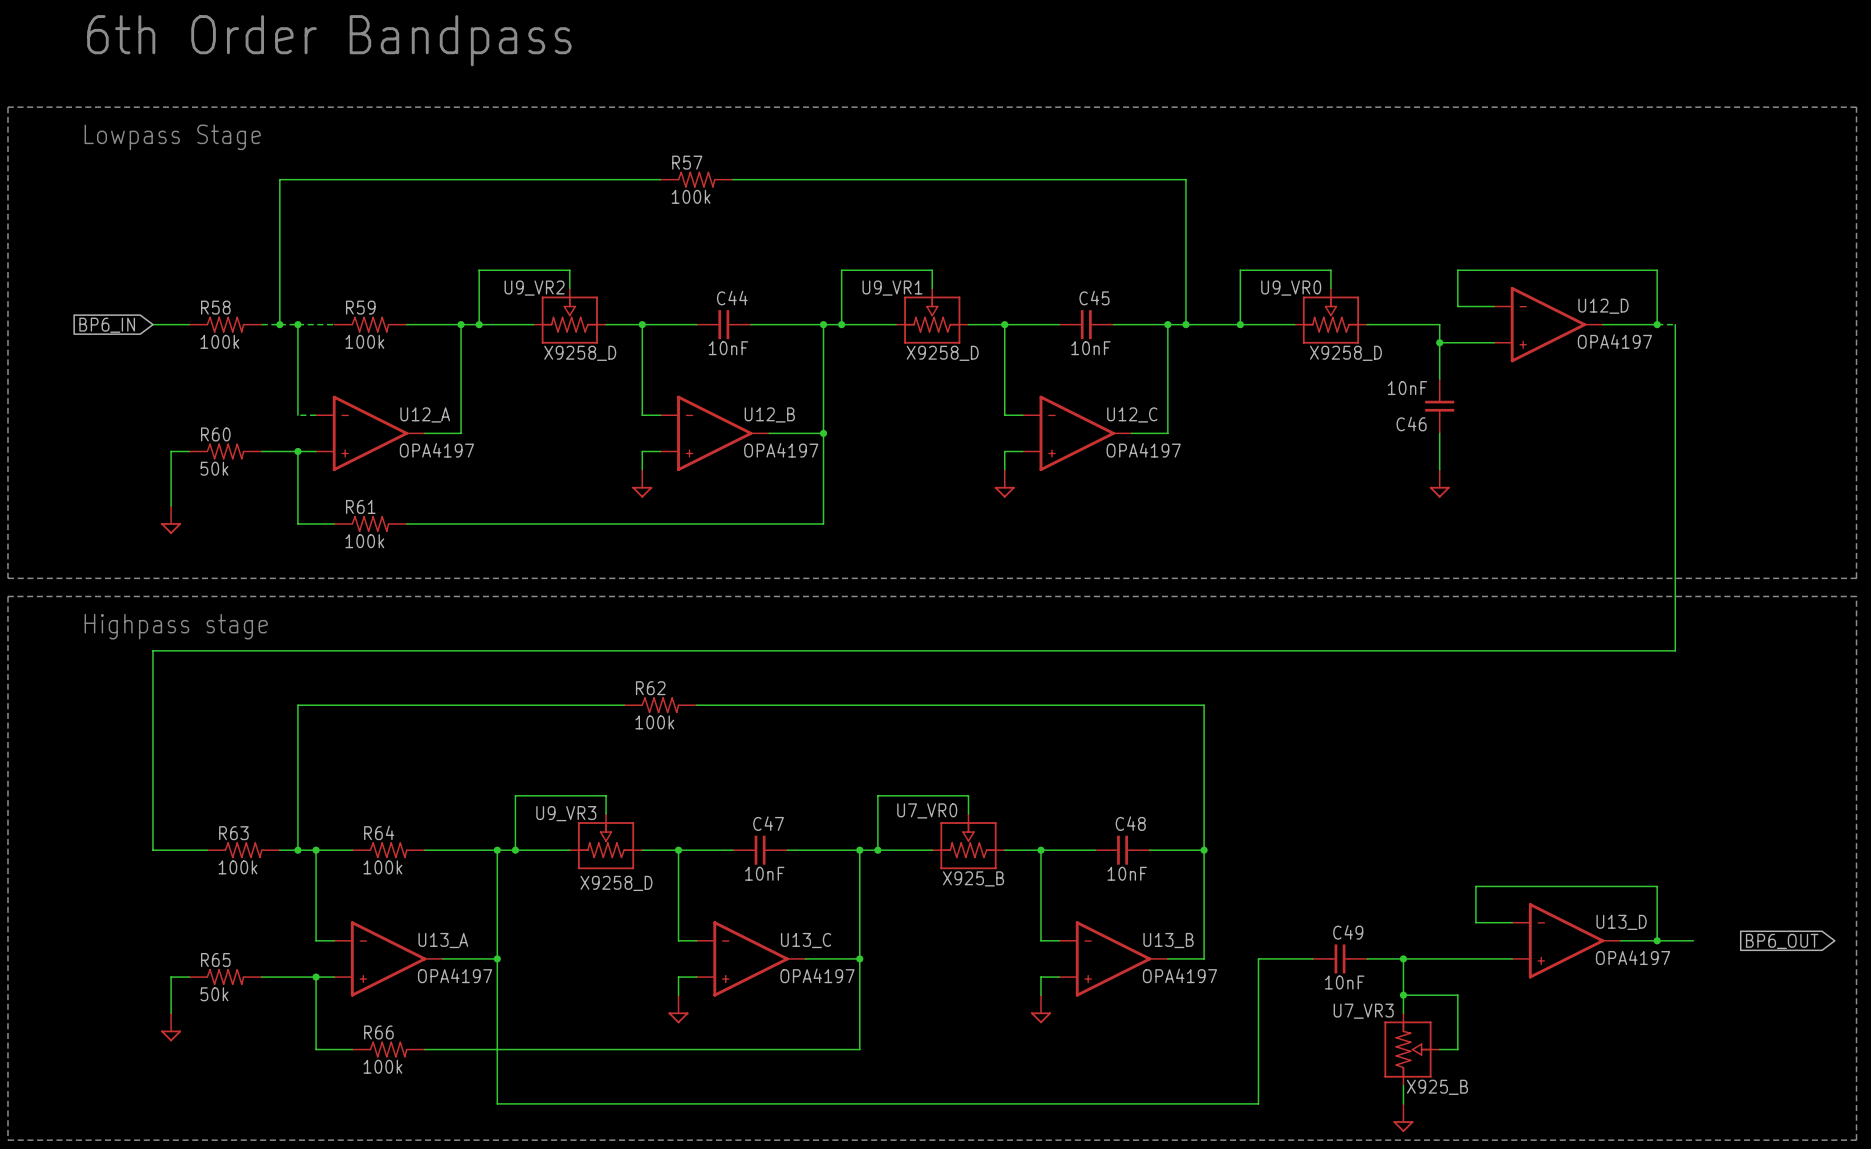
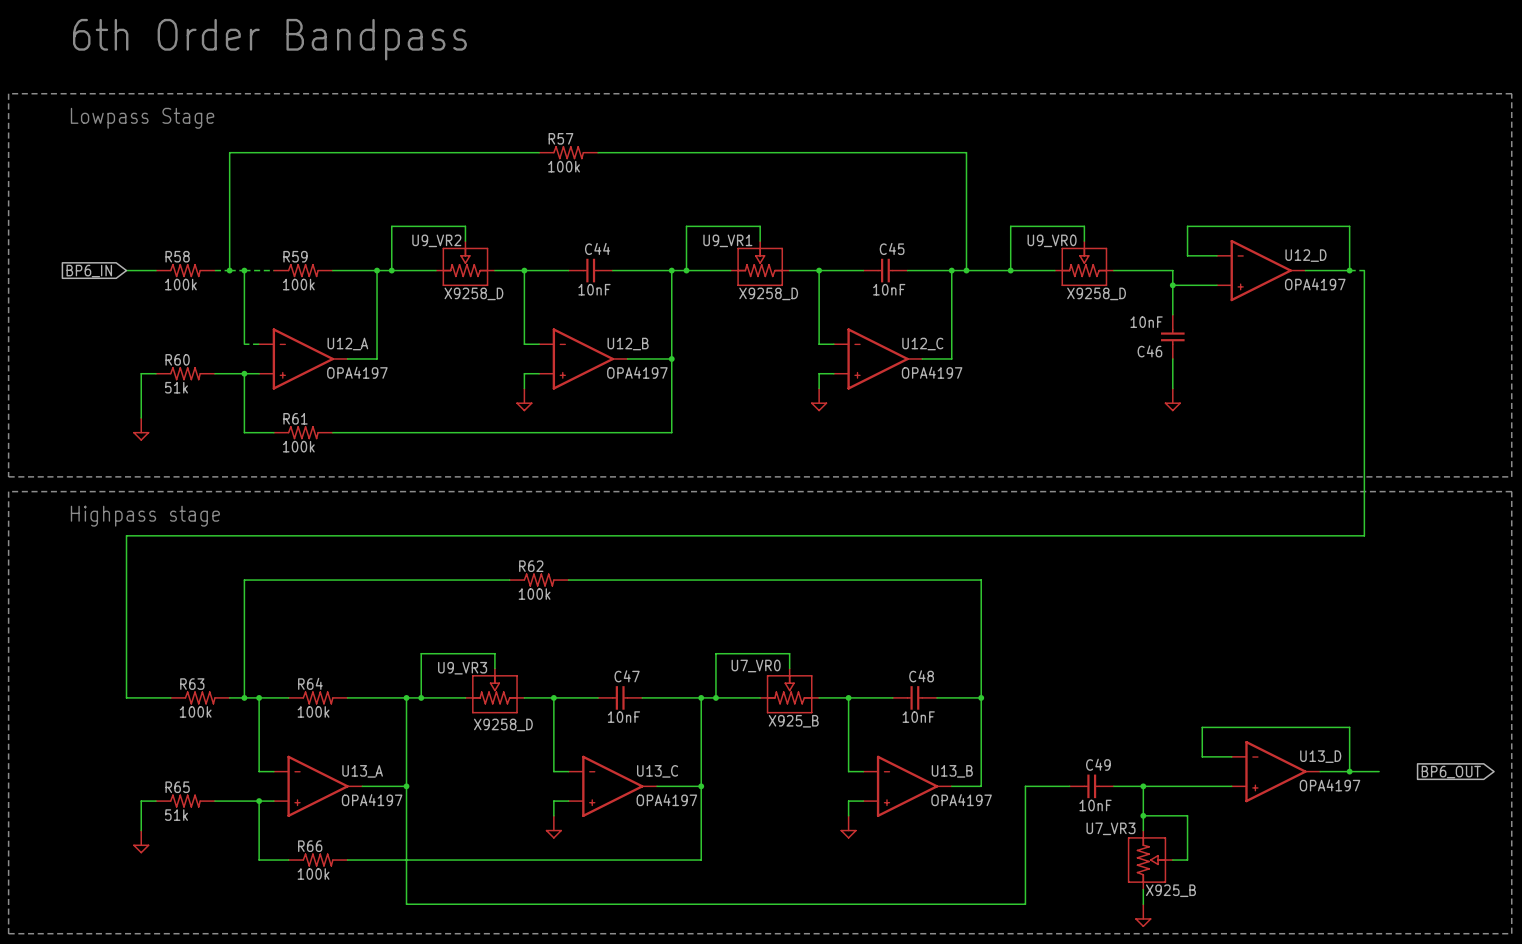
R60 value: 50k (214, 468) -> 51k (176, 387)
R65 value: 50k (214, 994) -> 51k (176, 815)

